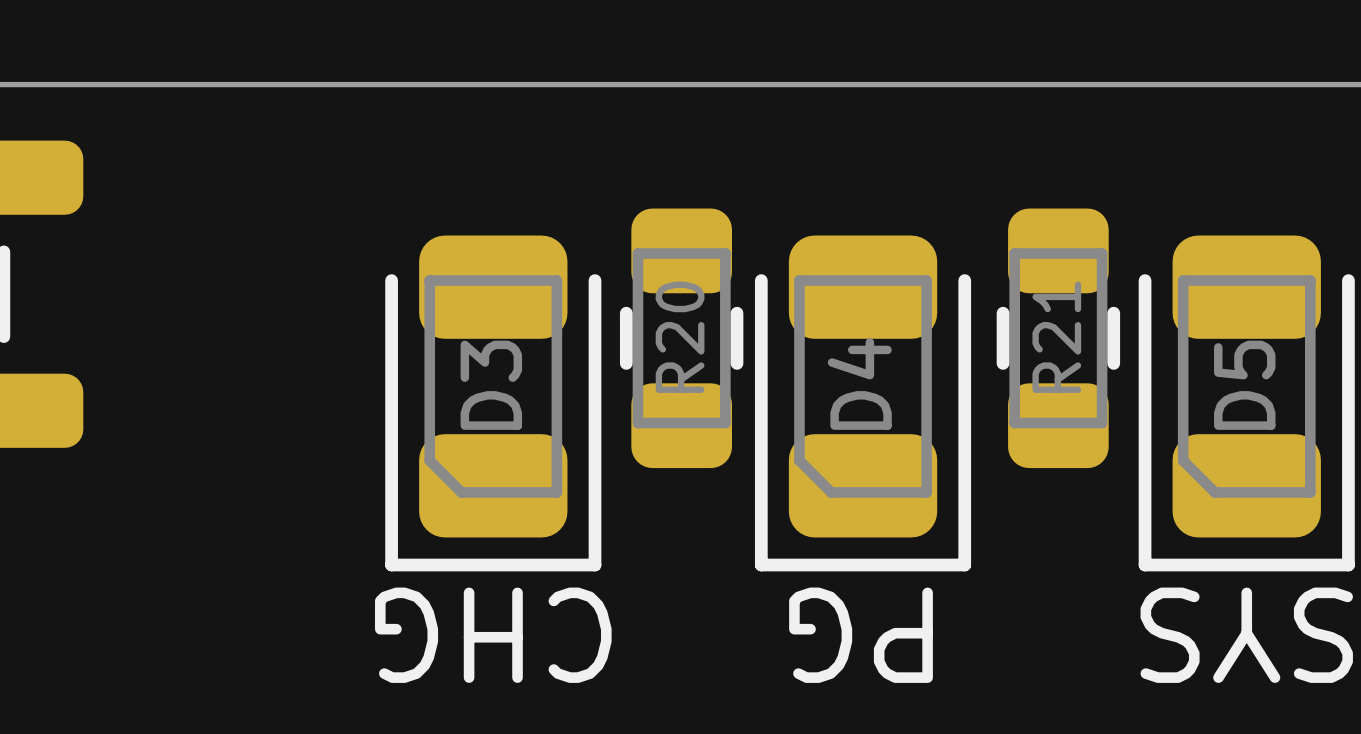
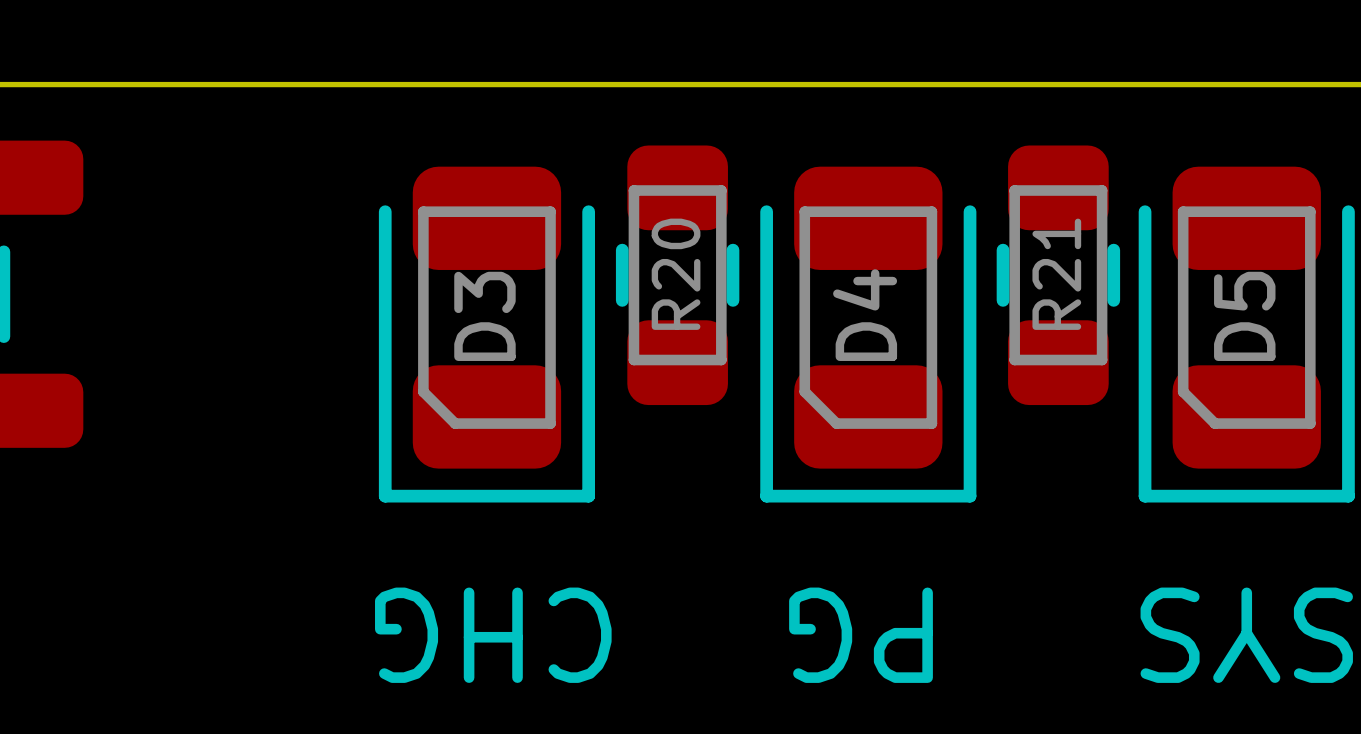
R20 position: (681, 338) -> (677, 275)
R21 position: (1058, 338) -> (1058, 275)
D3 position: (493, 403) -> (486, 334)
D4 position: (863, 403) -> (868, 334)
D5 position: (1246, 403) -> (1246, 334)

